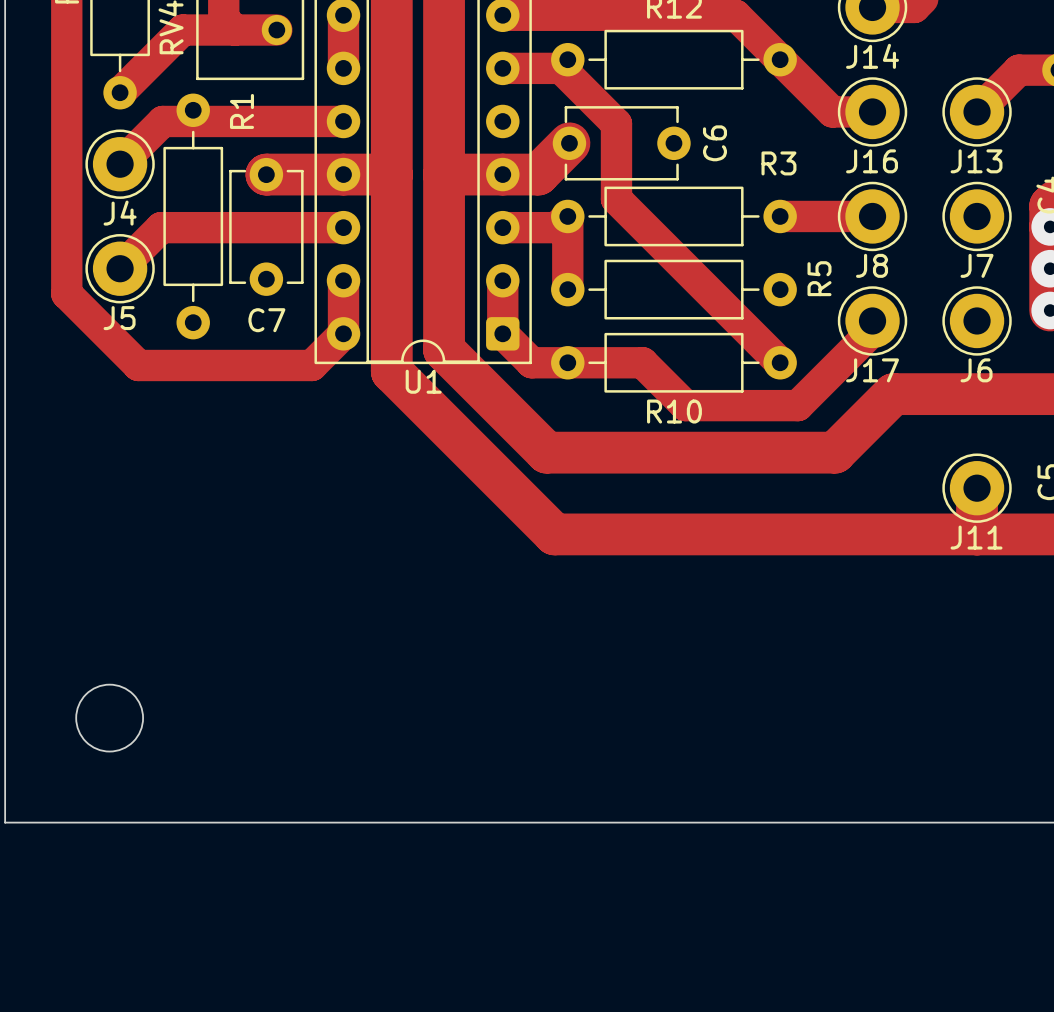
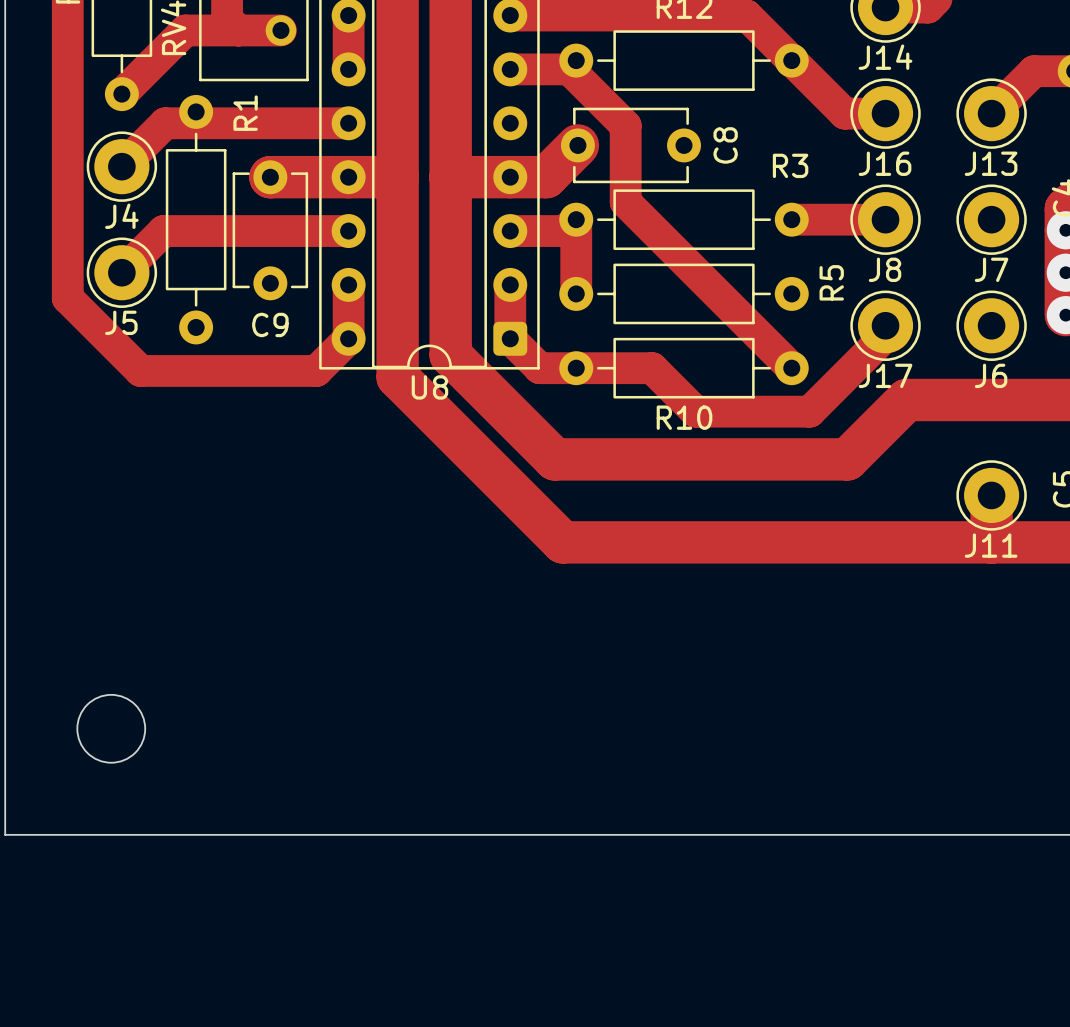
C6 name: C6 (714, 143) -> C8 (725, 145)
C7 name: C7 (266, 320) -> C9 (270, 324)
U1 name: U1 (423, 381) -> U8 (429, 387)

